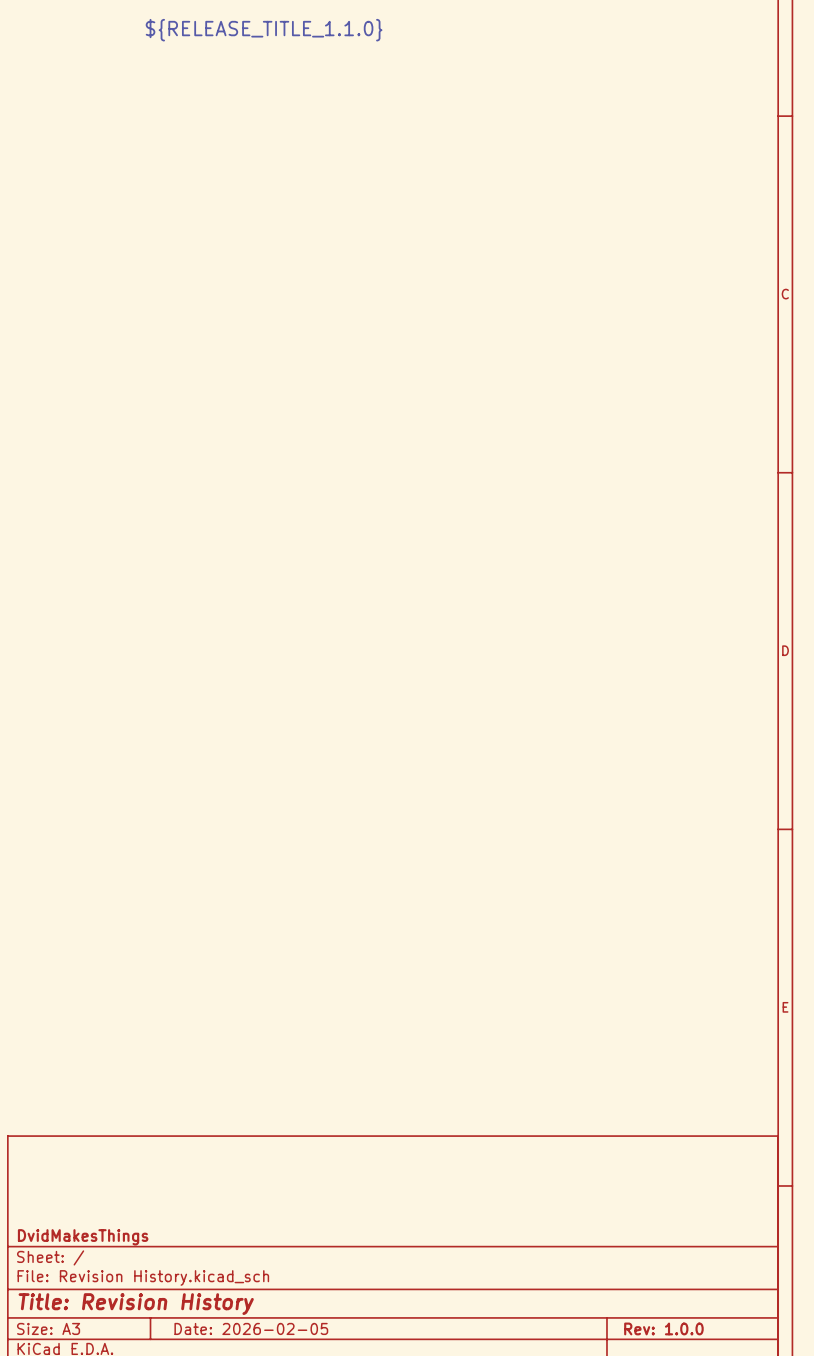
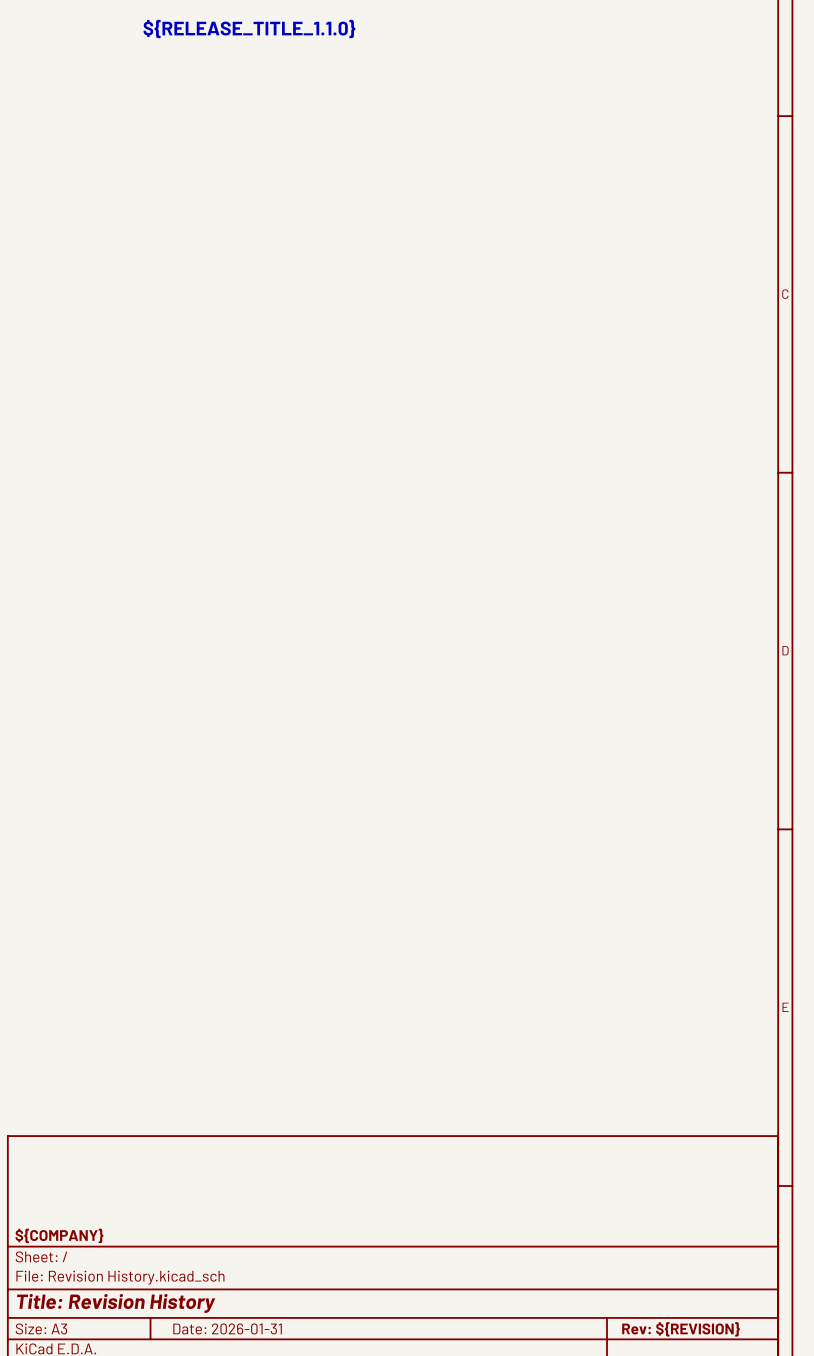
title block: DvidMakesThings (83, 1237) -> ${COMPANY} (59, 1235)
title block: Date: 2026-02-05 (251, 1328) -> Date: 2026-01-31 (227, 1328)
title block: Rev: 1.0.0 (663, 1328) -> Rev: ${REVISION} (681, 1329)

